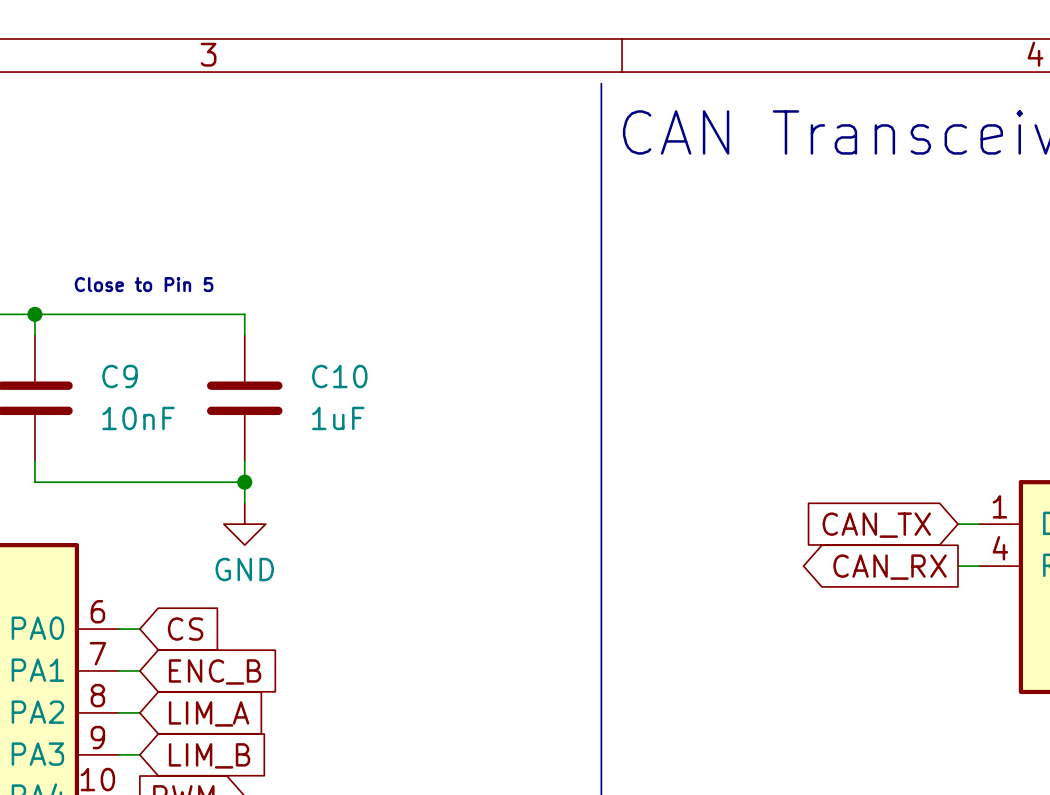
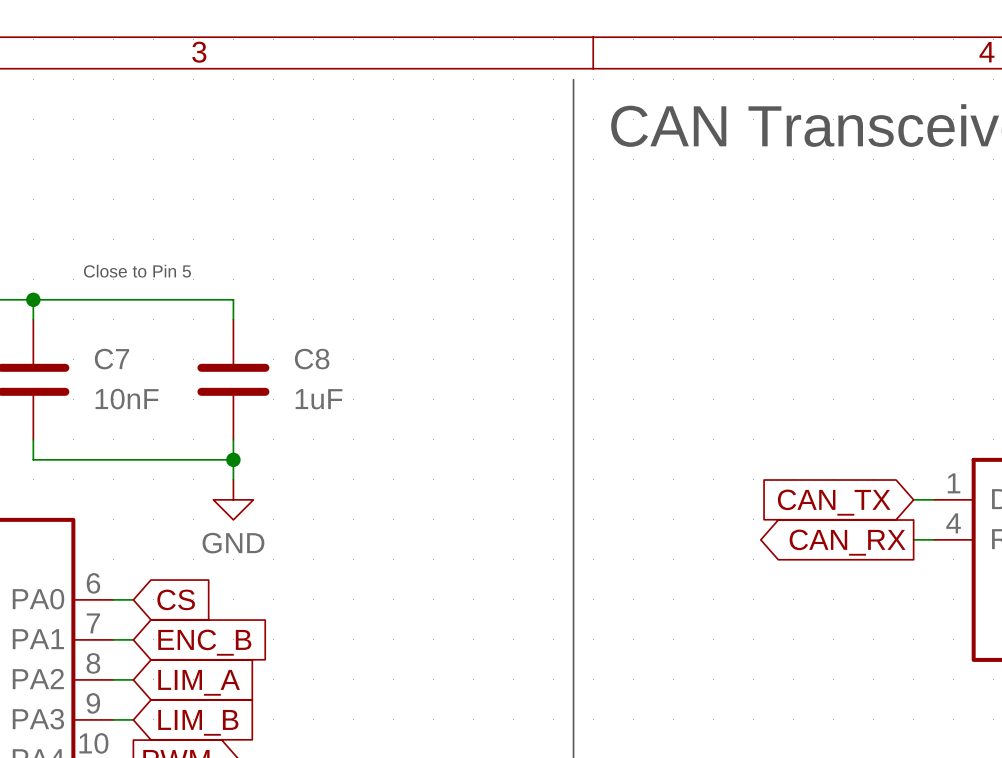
C9 name: C9 (120, 376) -> C7 (111, 359)
C10 name: C10 (339, 376) -> C8 (312, 359)

